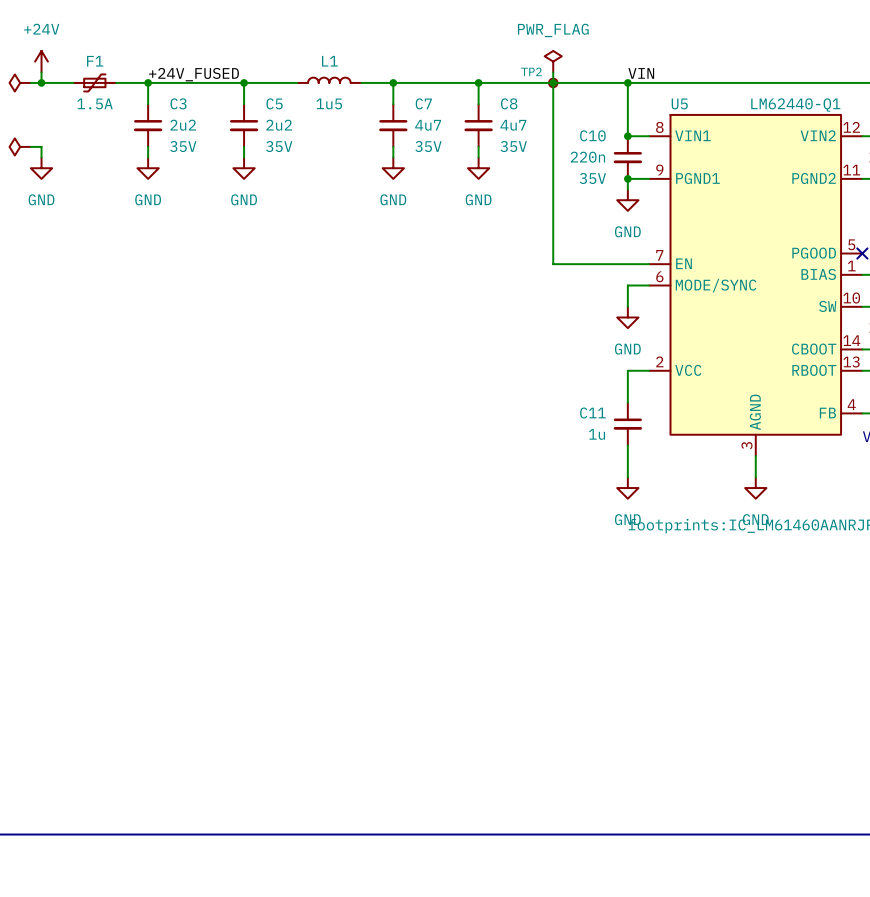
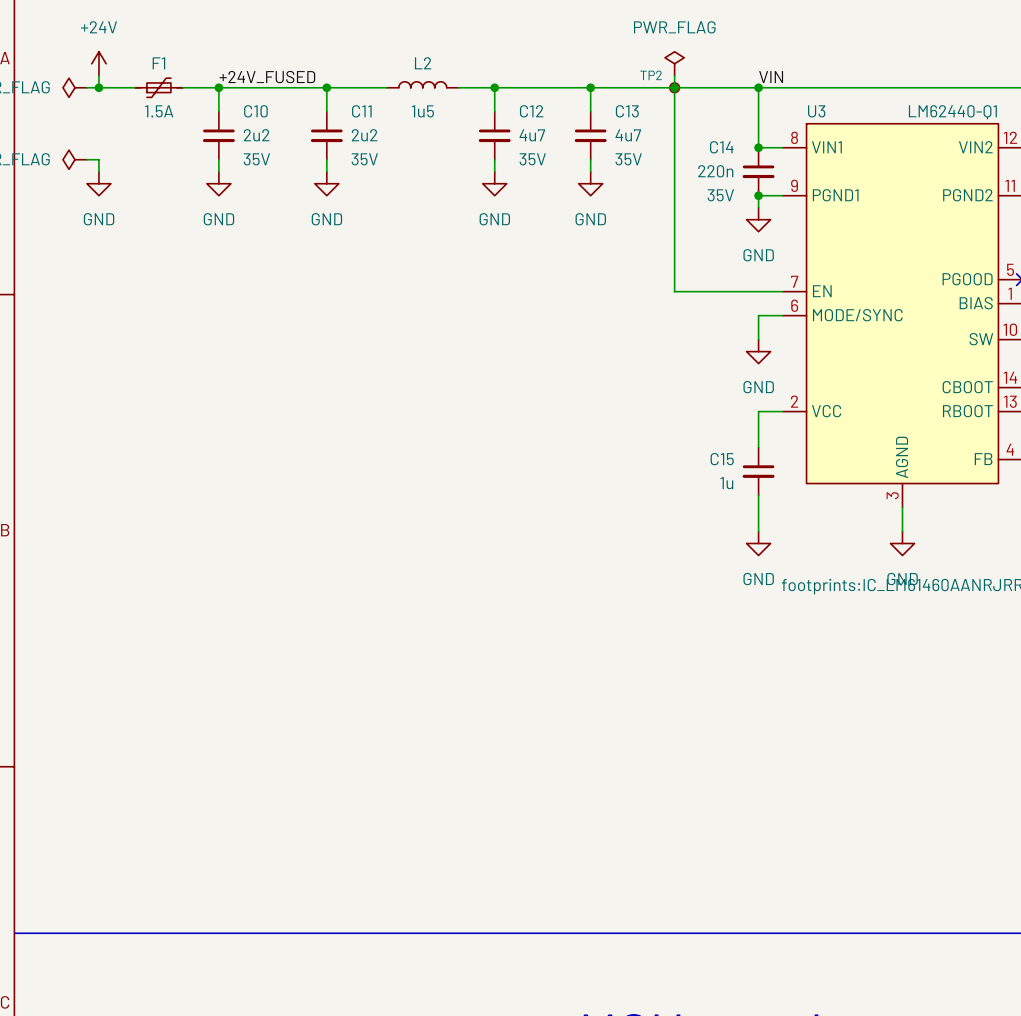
L1 name: L1 (329, 61) -> L2 (423, 63)
C3 name: C3 (178, 103) -> C10 (255, 111)
C5 name: C5 (274, 103) -> C11 (361, 111)
C7 name: C7 (423, 103) -> C12 (531, 111)
C8 name: C8 (509, 103) -> C13 (627, 111)
U5 name: U5 (679, 103) -> U3 (816, 111)
C10 name: C10 (592, 135) -> C14 (721, 147)
C11 name: C11 (592, 413) -> C15 (722, 459)

